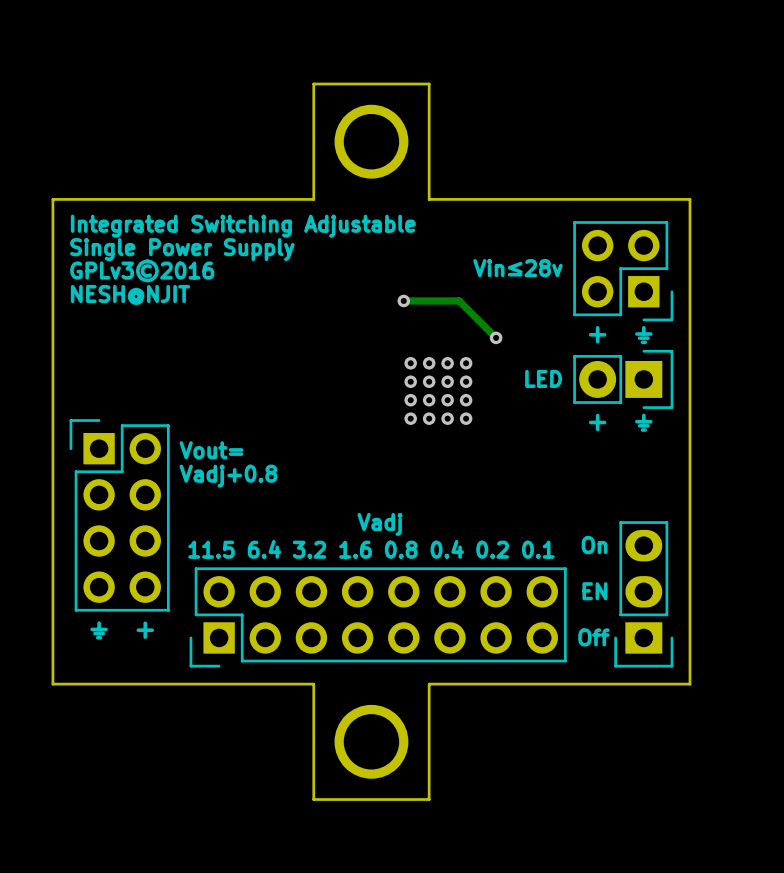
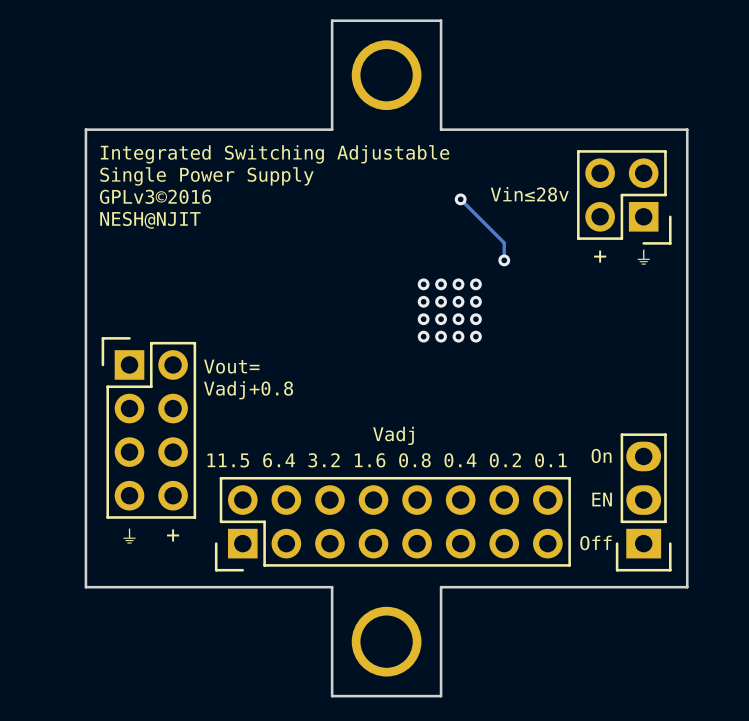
track: (403, 300) (459, 300) (496, 337) -> (460, 199) (504, 242) (504, 260)
via position: (403, 300) -> (460, 199)
text: LED (543, 378) -> none
part: (623, 379) -> none
text: + (597, 422) -> none
text: ⏚ (643, 422) -> none

